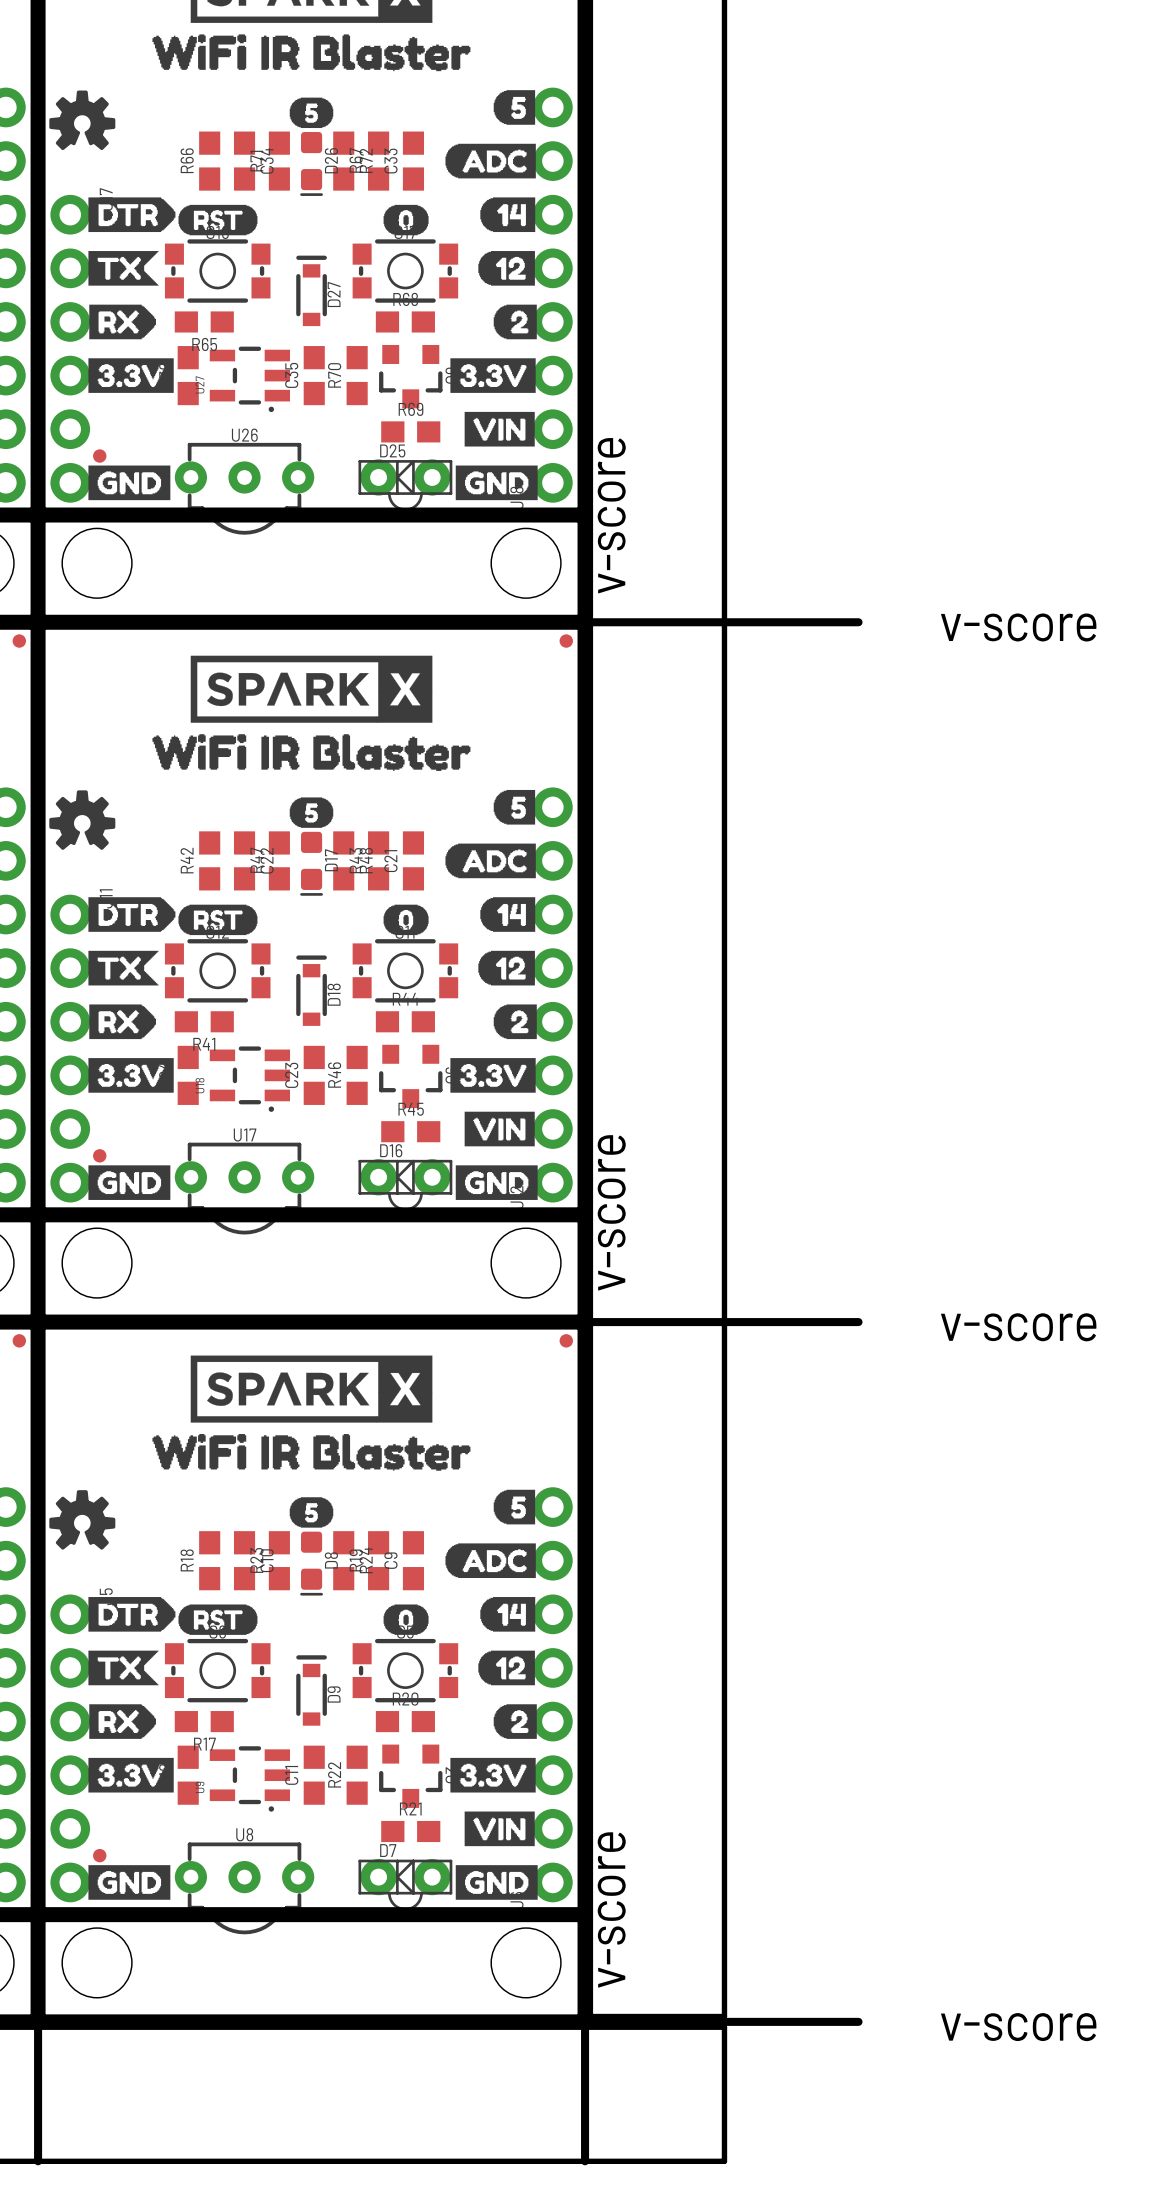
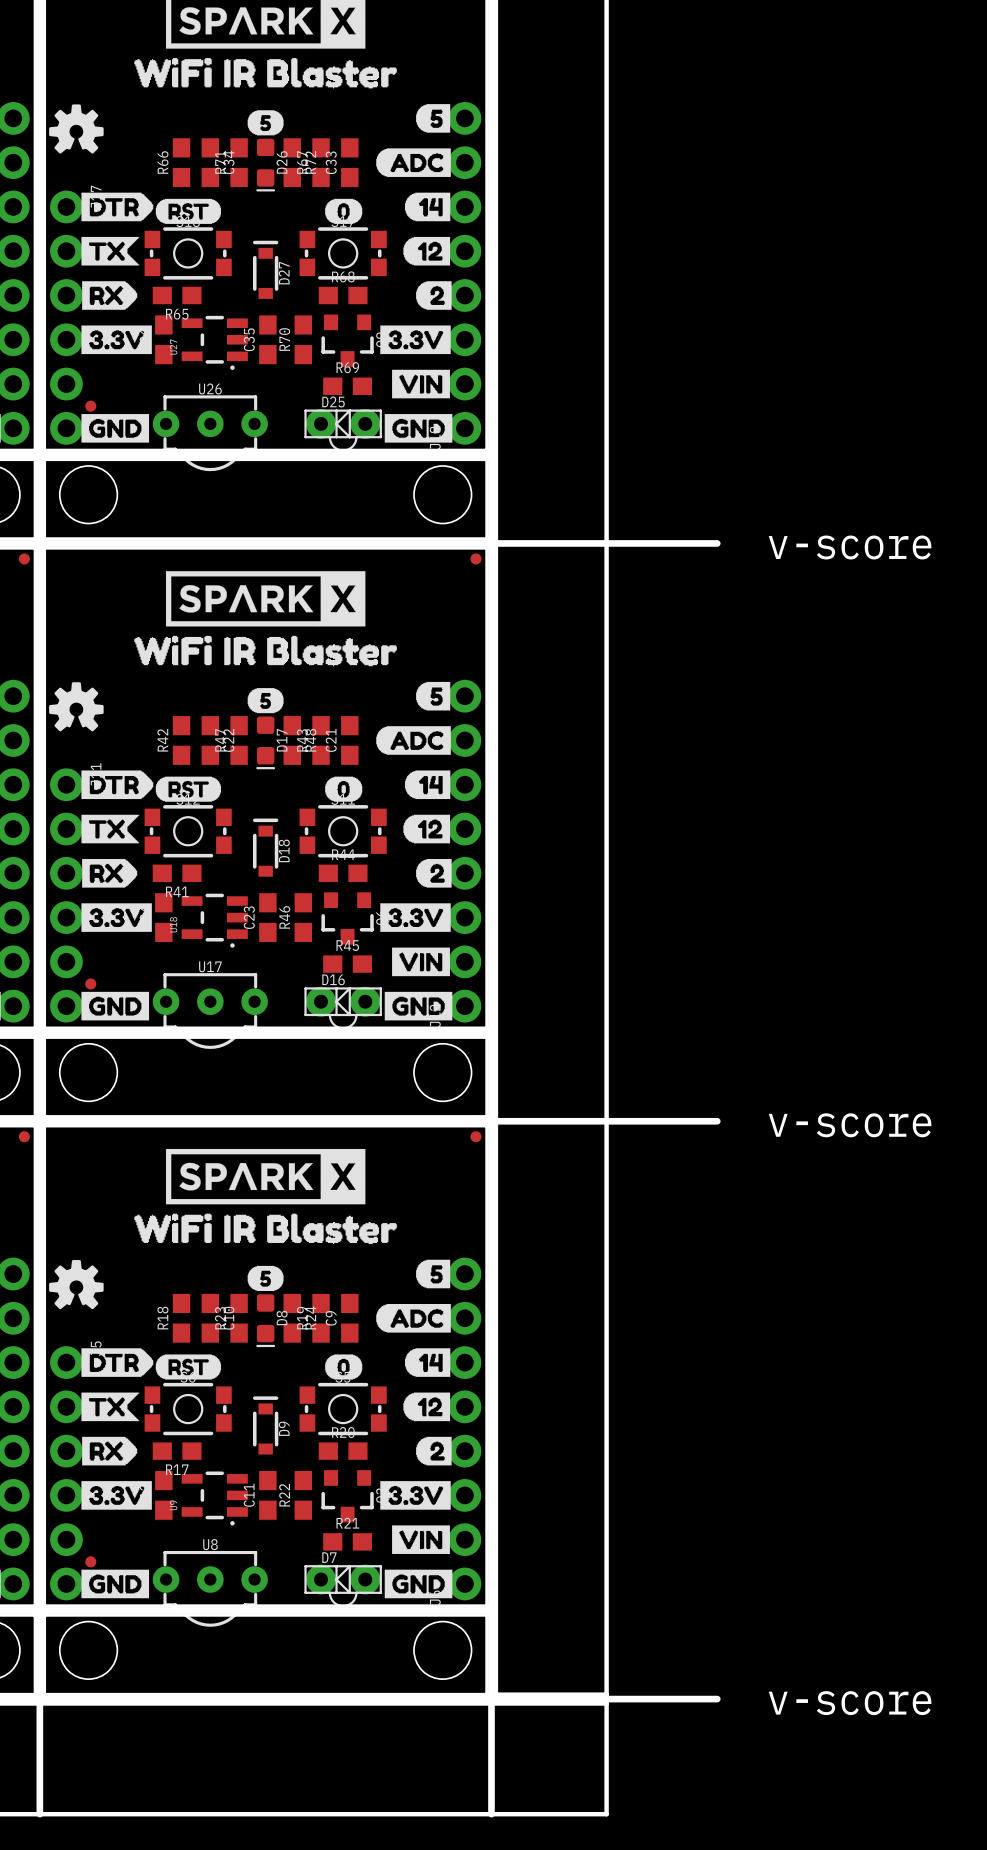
text: v-score (611, 515) -> none
text: v-score (611, 1212) -> none
text: v-score (611, 1909) -> none

